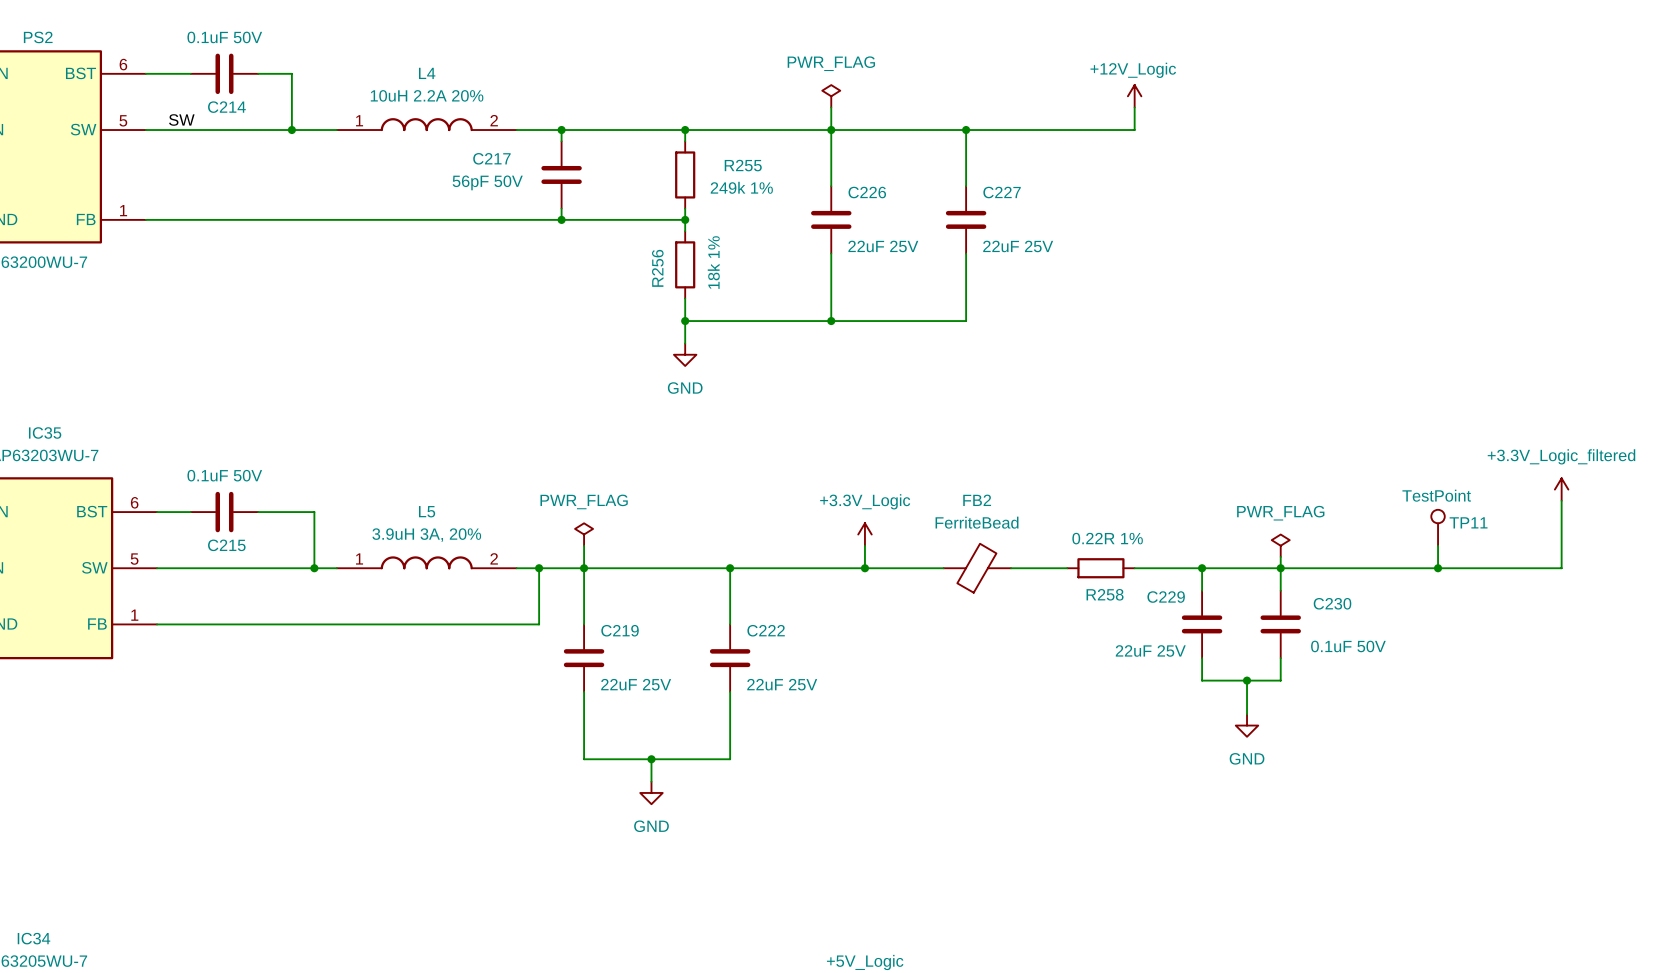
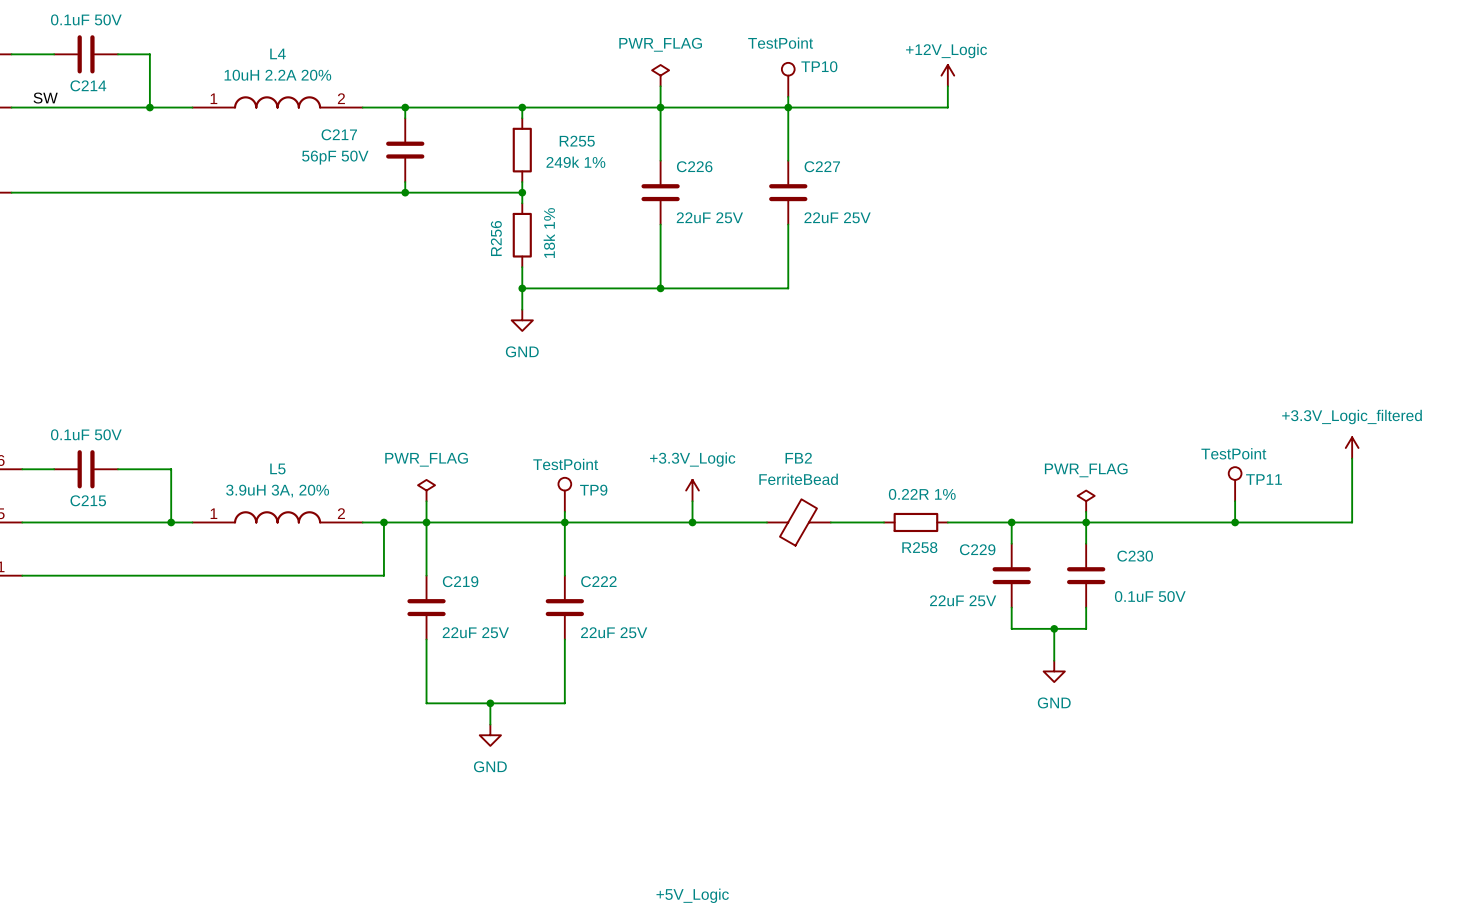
TP10: none -> TestPoint (788, 79)
wire: none -> (788, 96) (788, 107)
TP9: none -> TestPoint (564, 494)
wire: none -> (564, 511) (564, 522)

